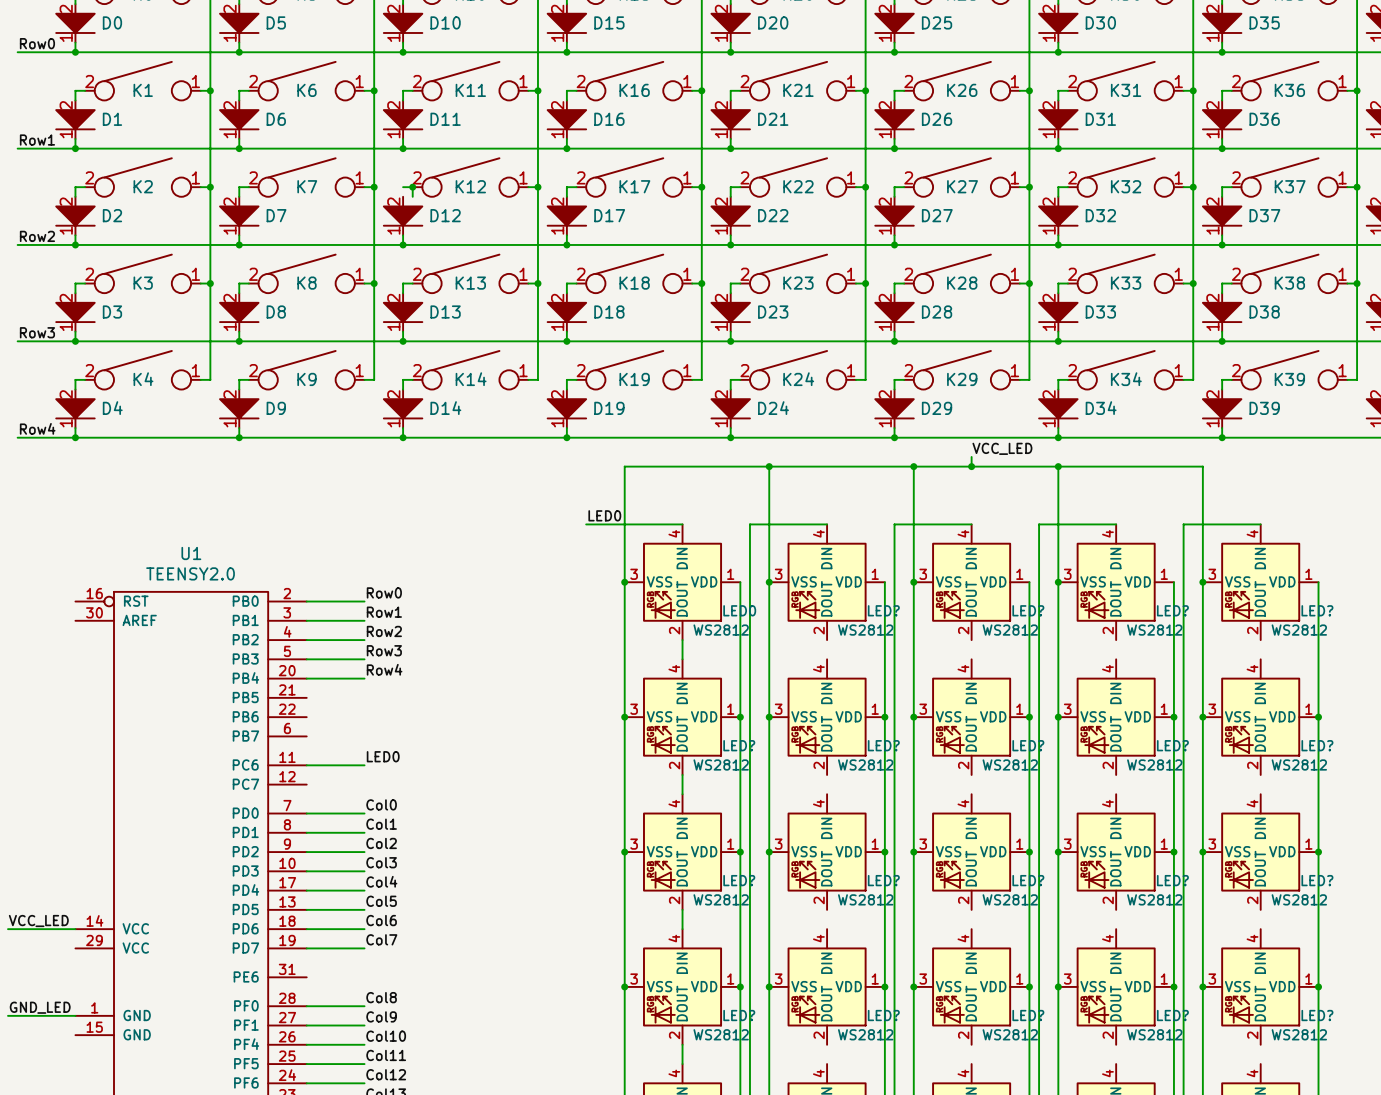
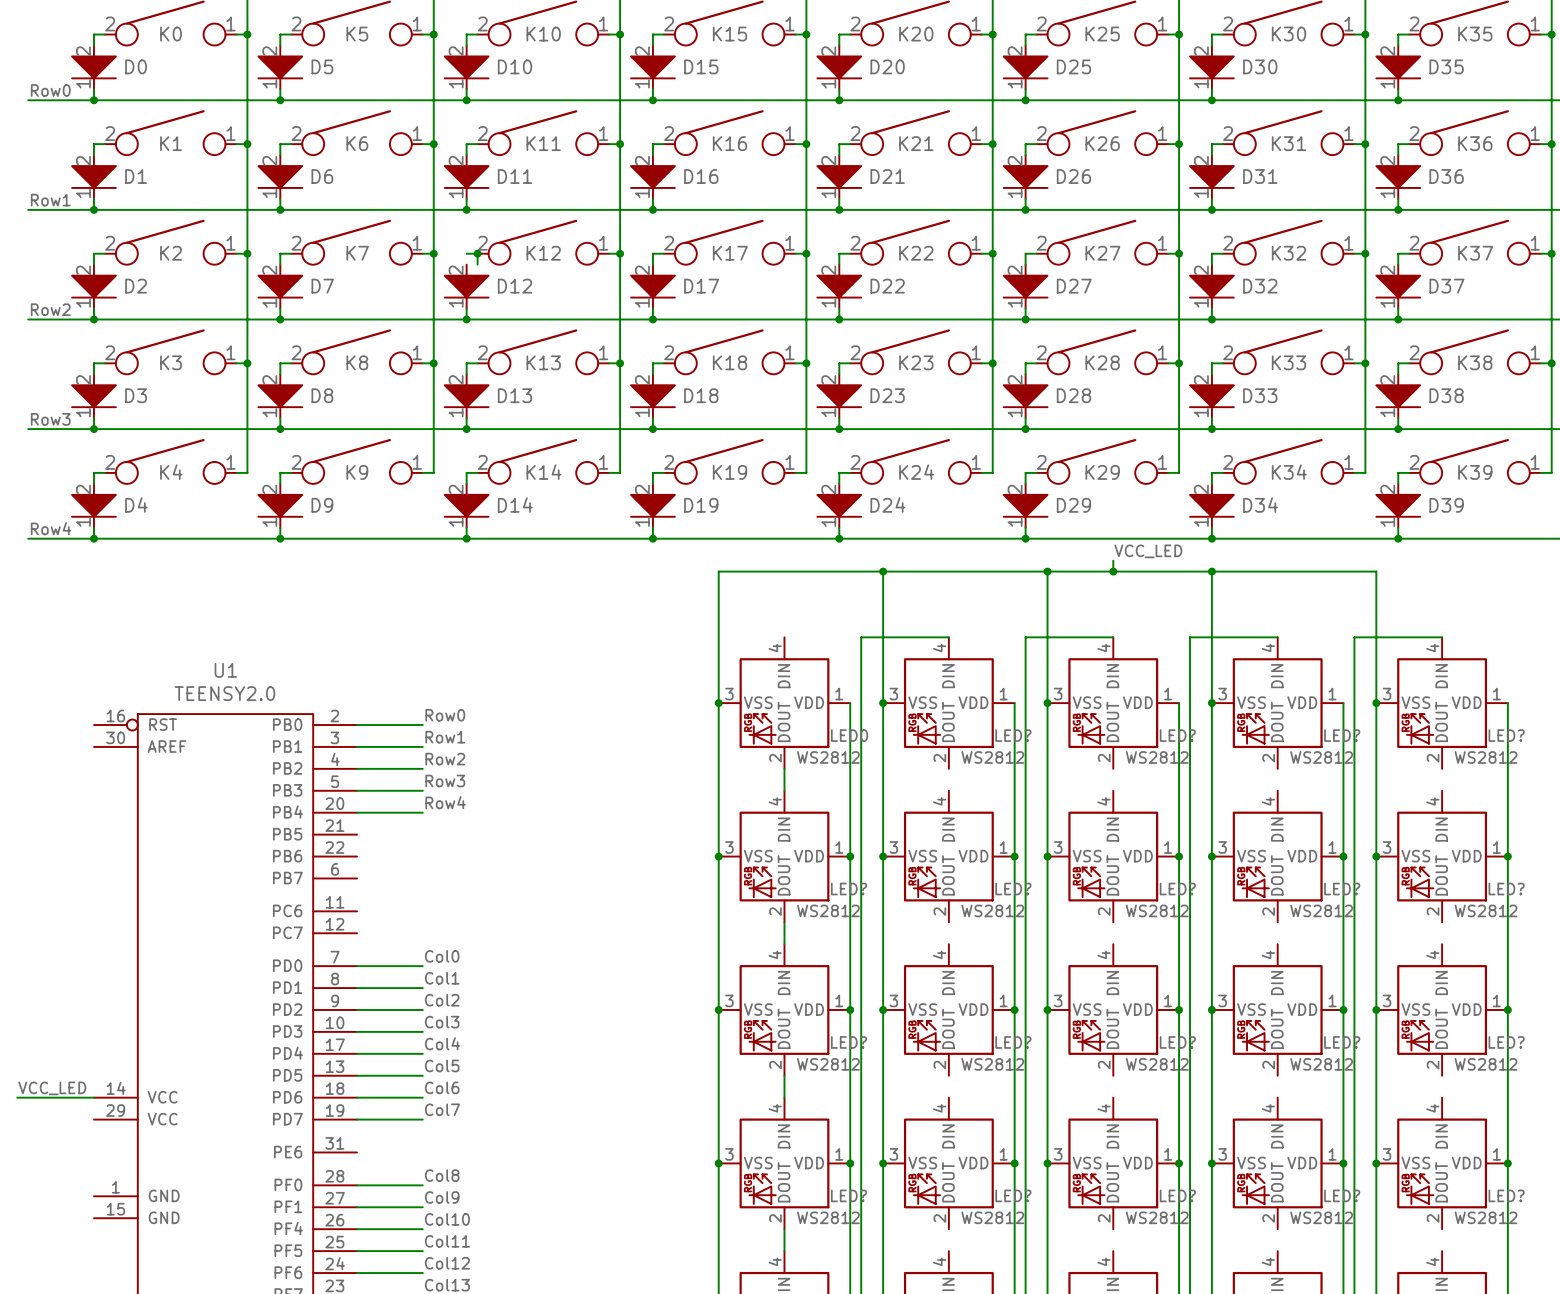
label: LED0 (604, 515) -> none
wire: (586, 524) (682, 524) -> none
label: LED0 (383, 756) -> none
wire: (306, 765) (364, 765) -> none
label: GND_LED (40, 1007) -> none
wire: (8, 1015) (75, 1015) -> none

